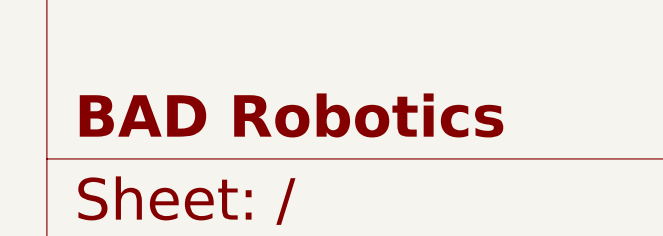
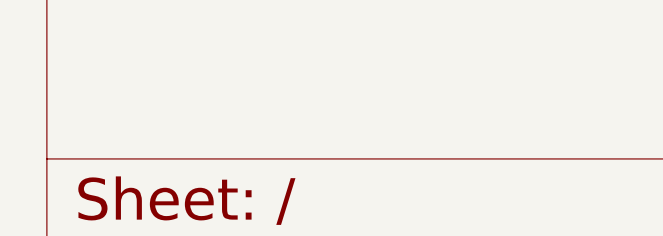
title block: BAD Robotics (291, 115) -> none

